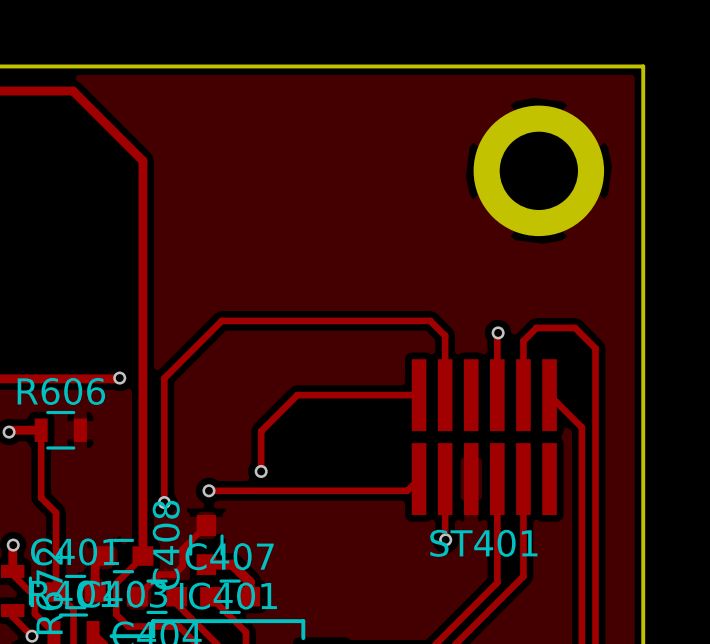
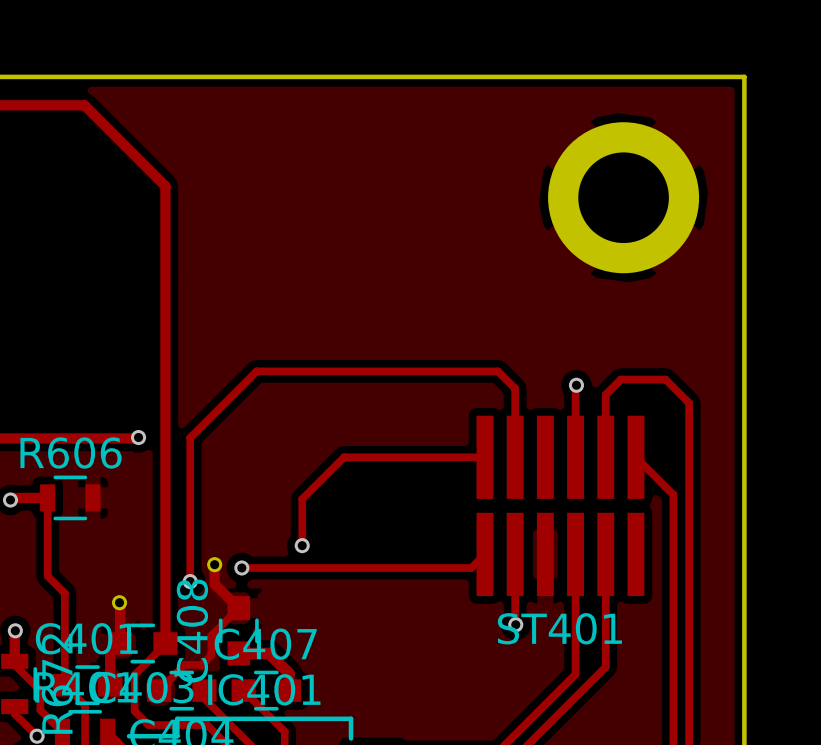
track: none -> (214, 564) (214, 583) (238, 608)
part: none -> (214, 564)
track: none -> (119, 602) (120, 643)
part: none -> (119, 602)

